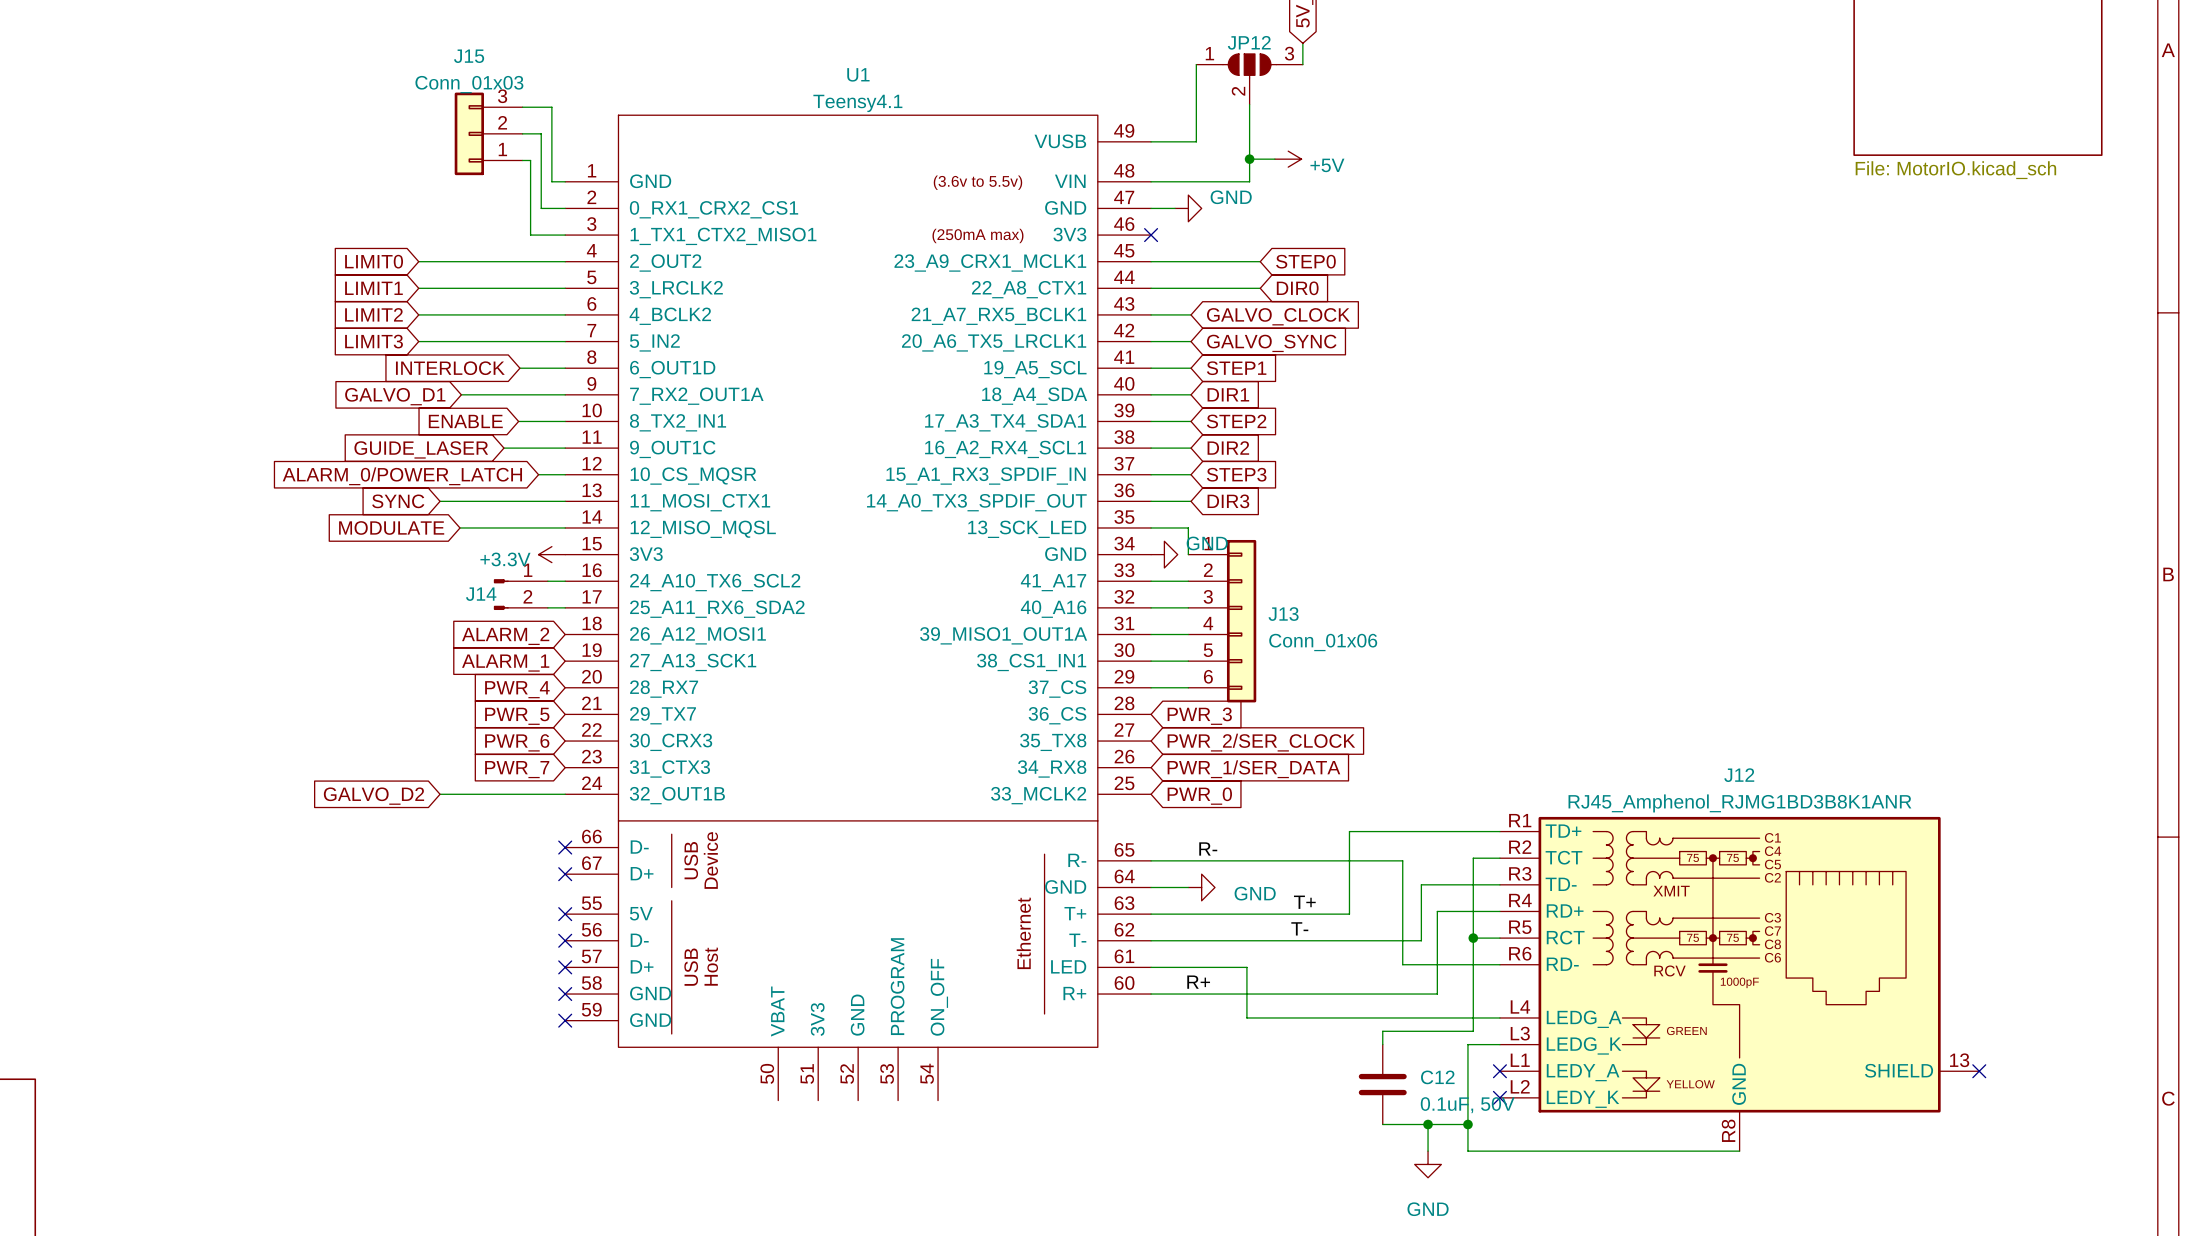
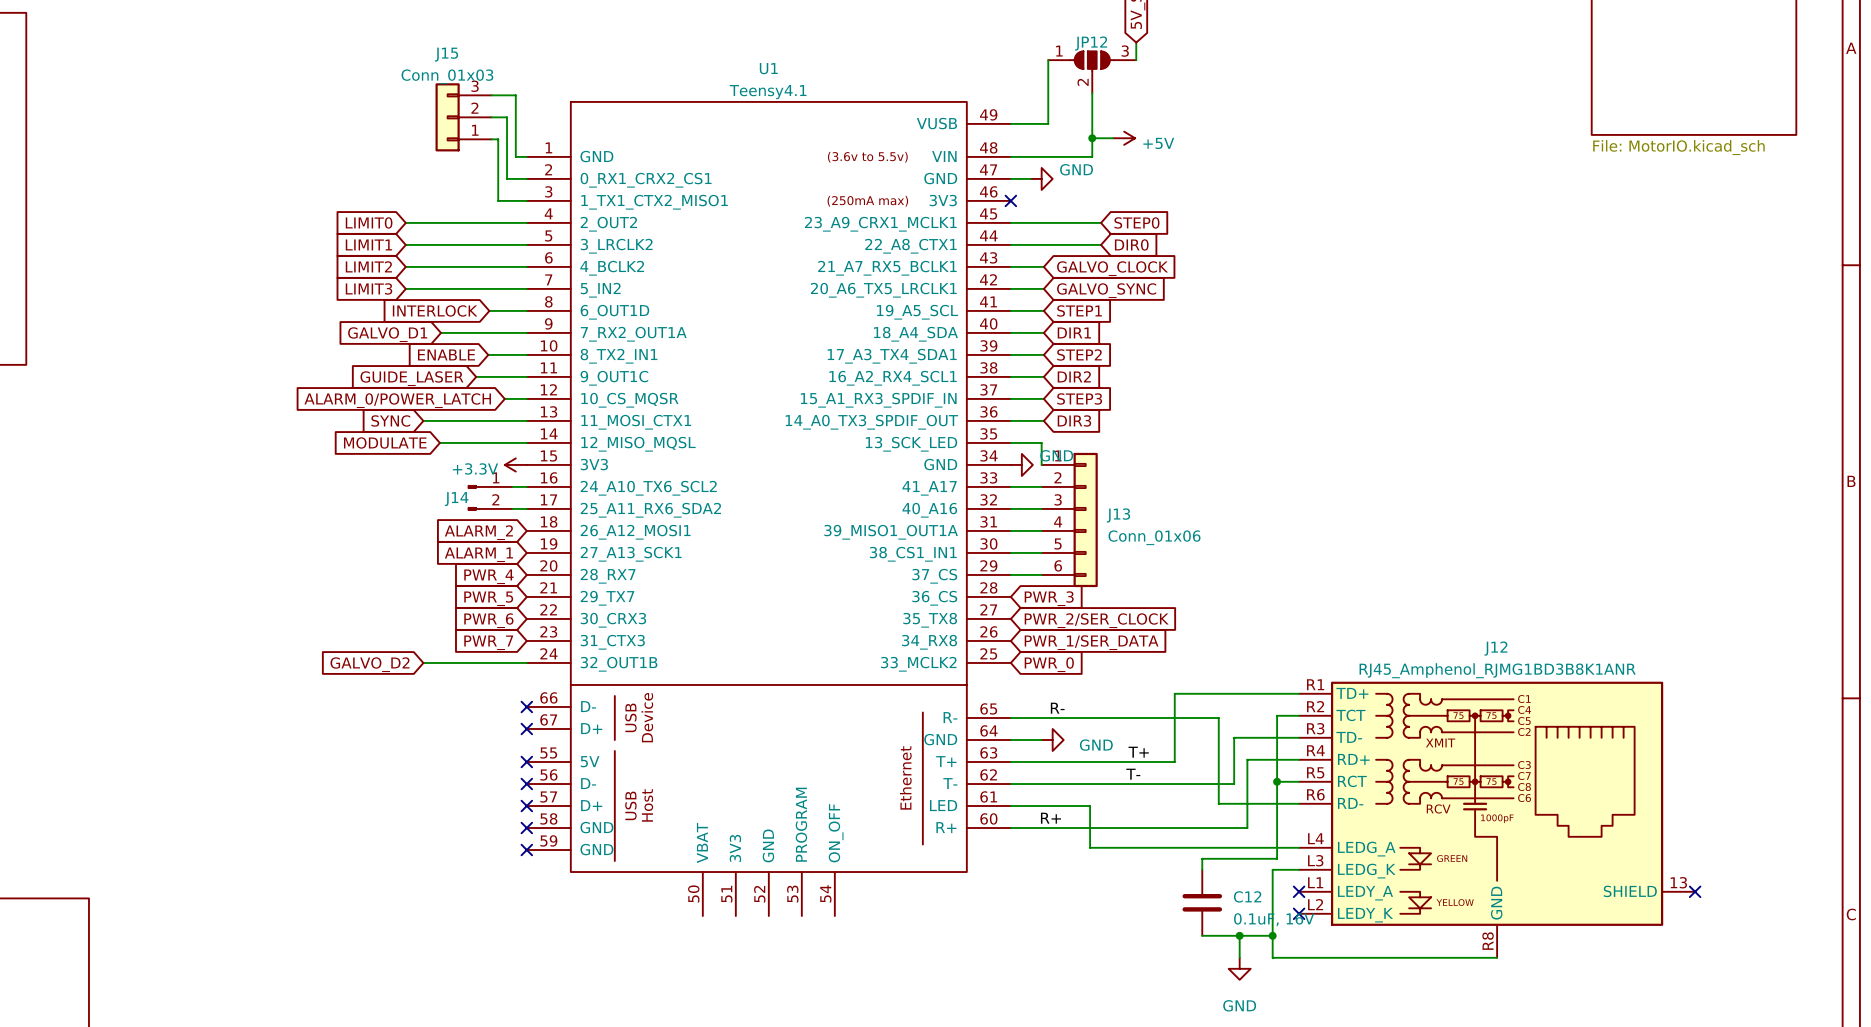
C12 value: 0.1uF, 50V (1467, 1105) -> 0.1uF, 16V (1274, 919)

